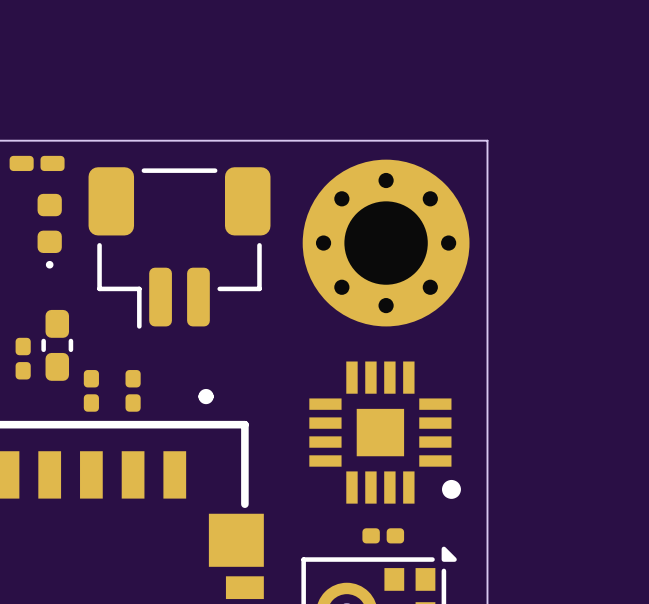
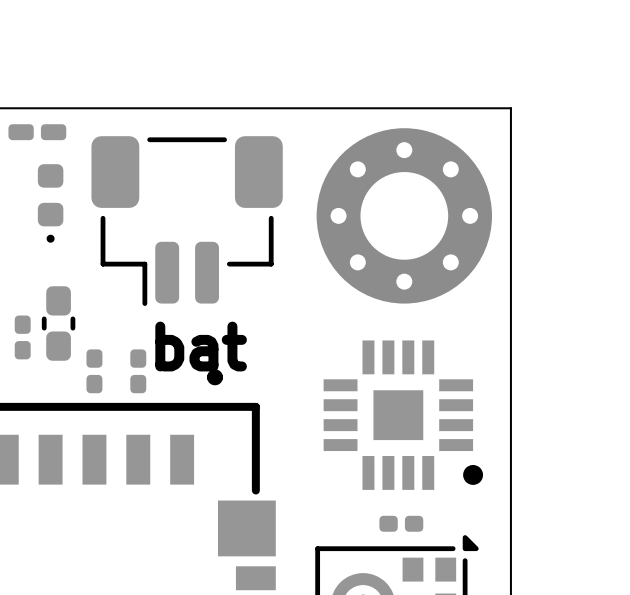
text: none -> bat (201, 346)

